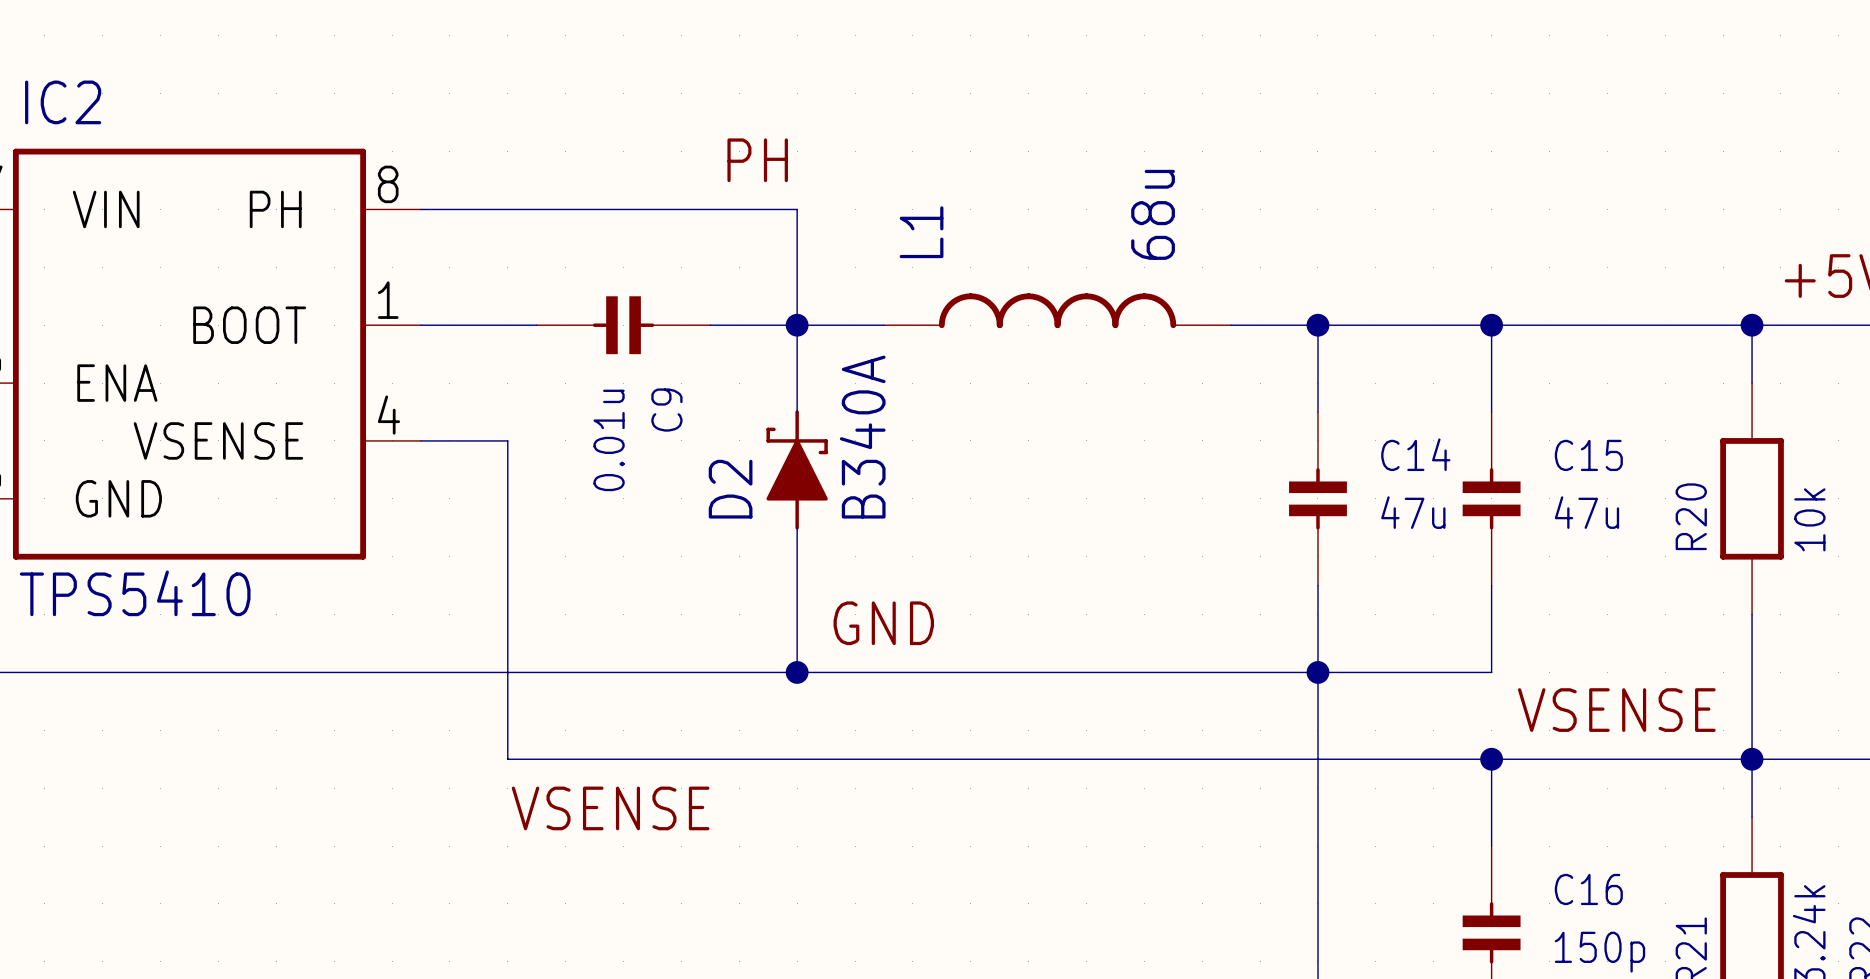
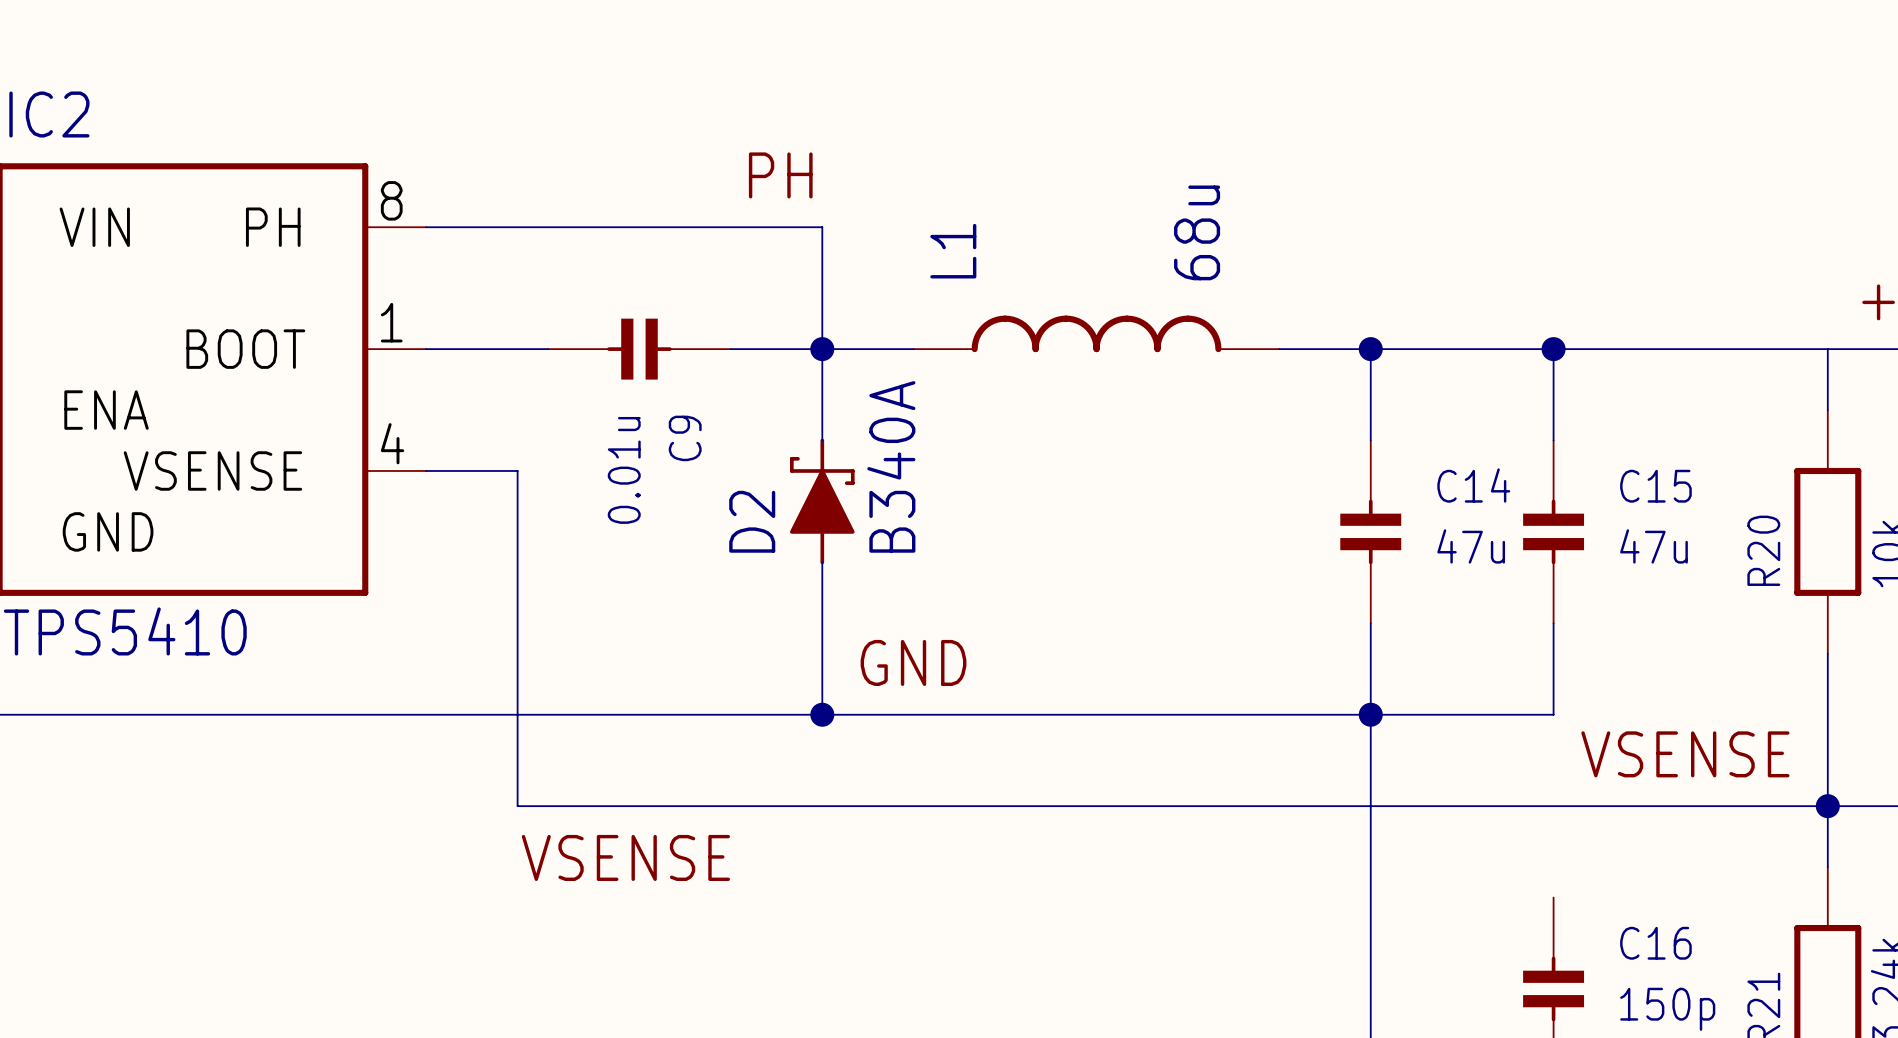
junction: (1752, 325) -> none
wire: (1491, 759) (1491, 846) -> none
junction: (1491, 759) -> none

